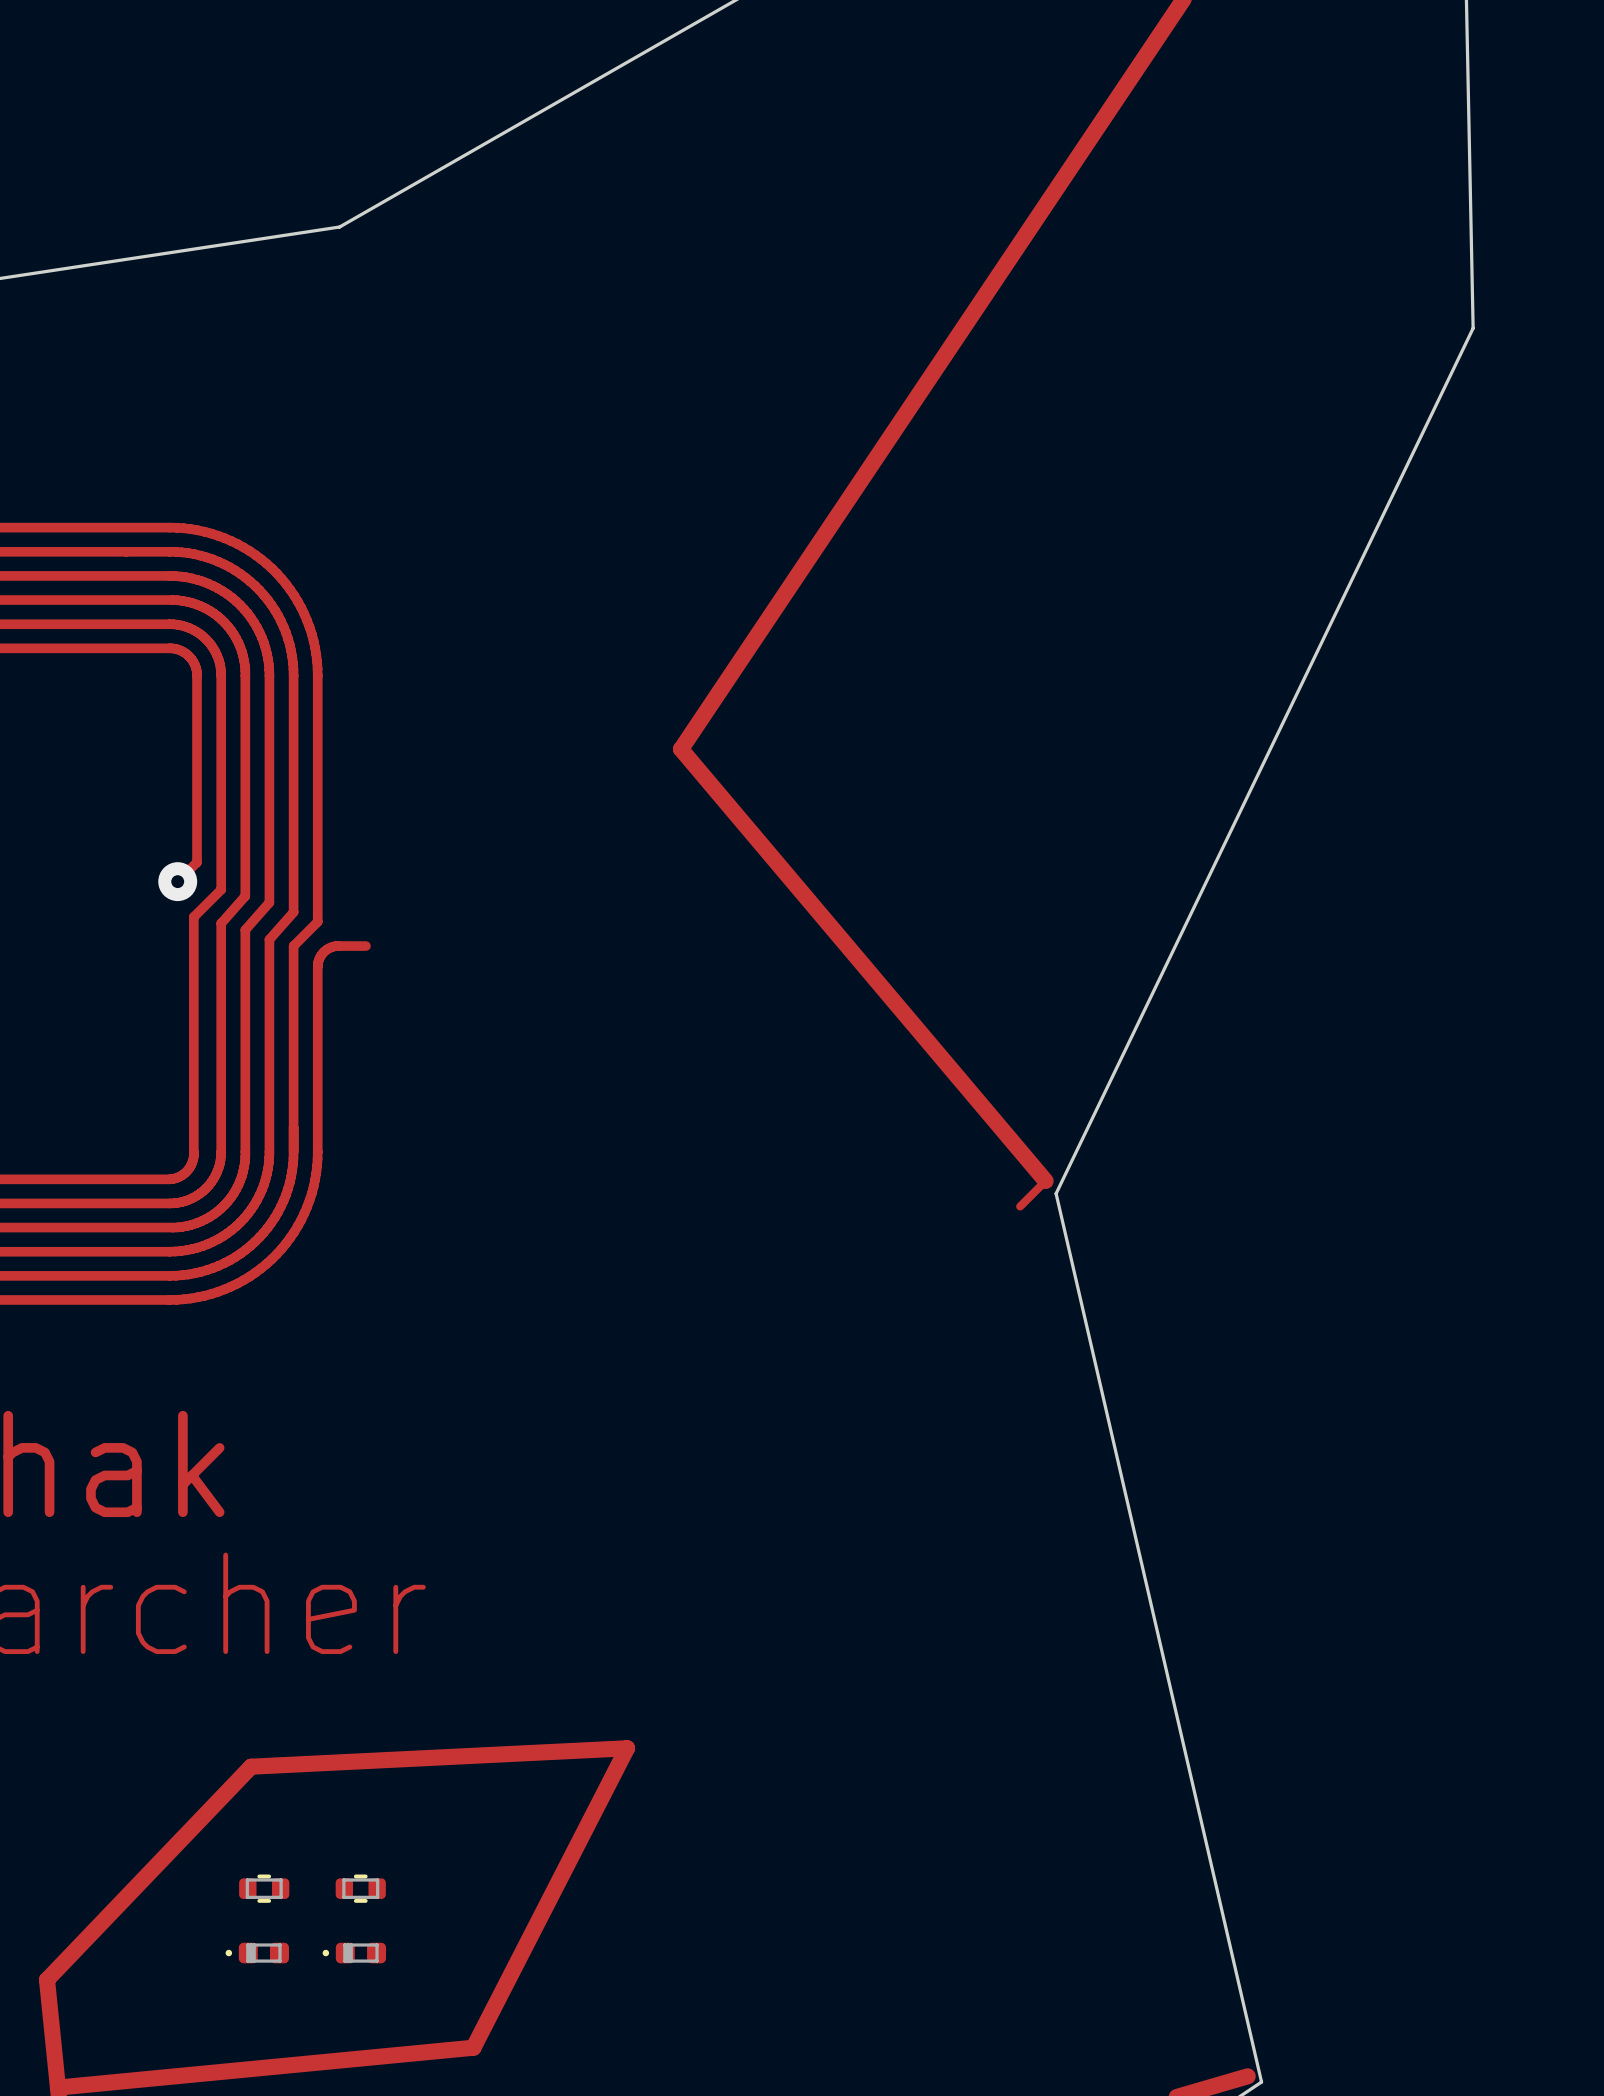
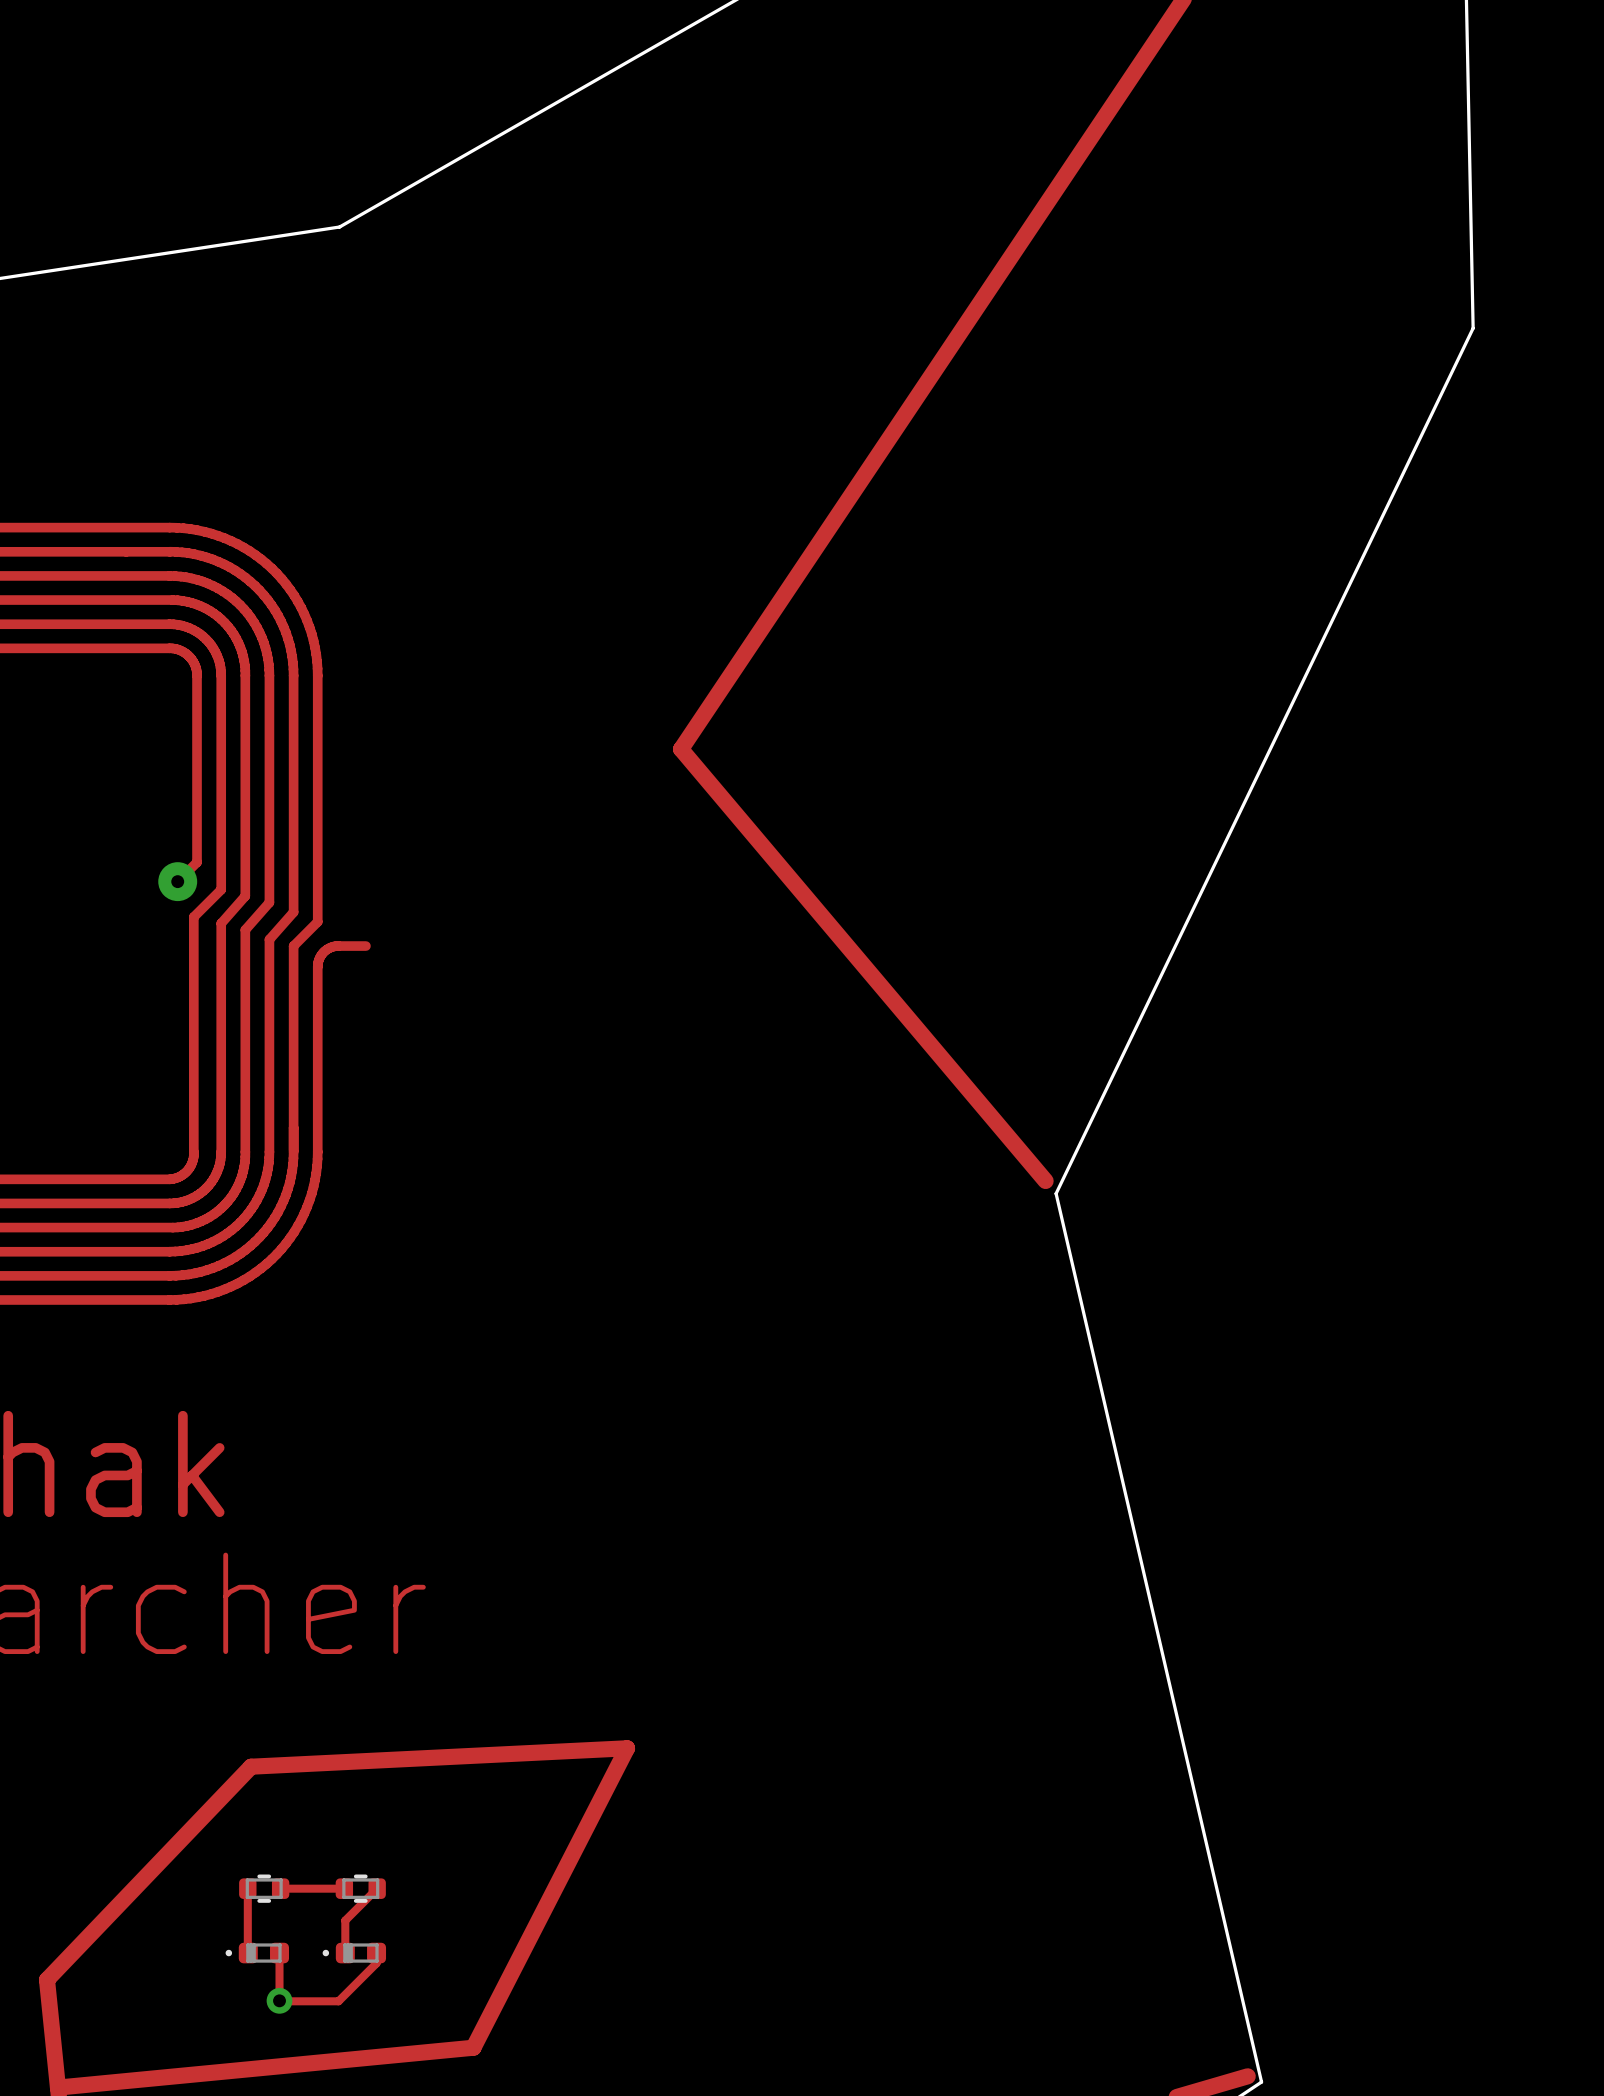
track: (1045, 1181) (1020, 1206) -> none
track: none -> (247, 1888) (248, 1953)
track: none -> (280, 1888) (344, 1888)
track: none -> (377, 1888) (345, 1920) (345, 1953)
track: none -> (279, 1953) (279, 2001) (338, 2001) (376, 1963) (376, 1953)
via: none -> (279, 2000)

